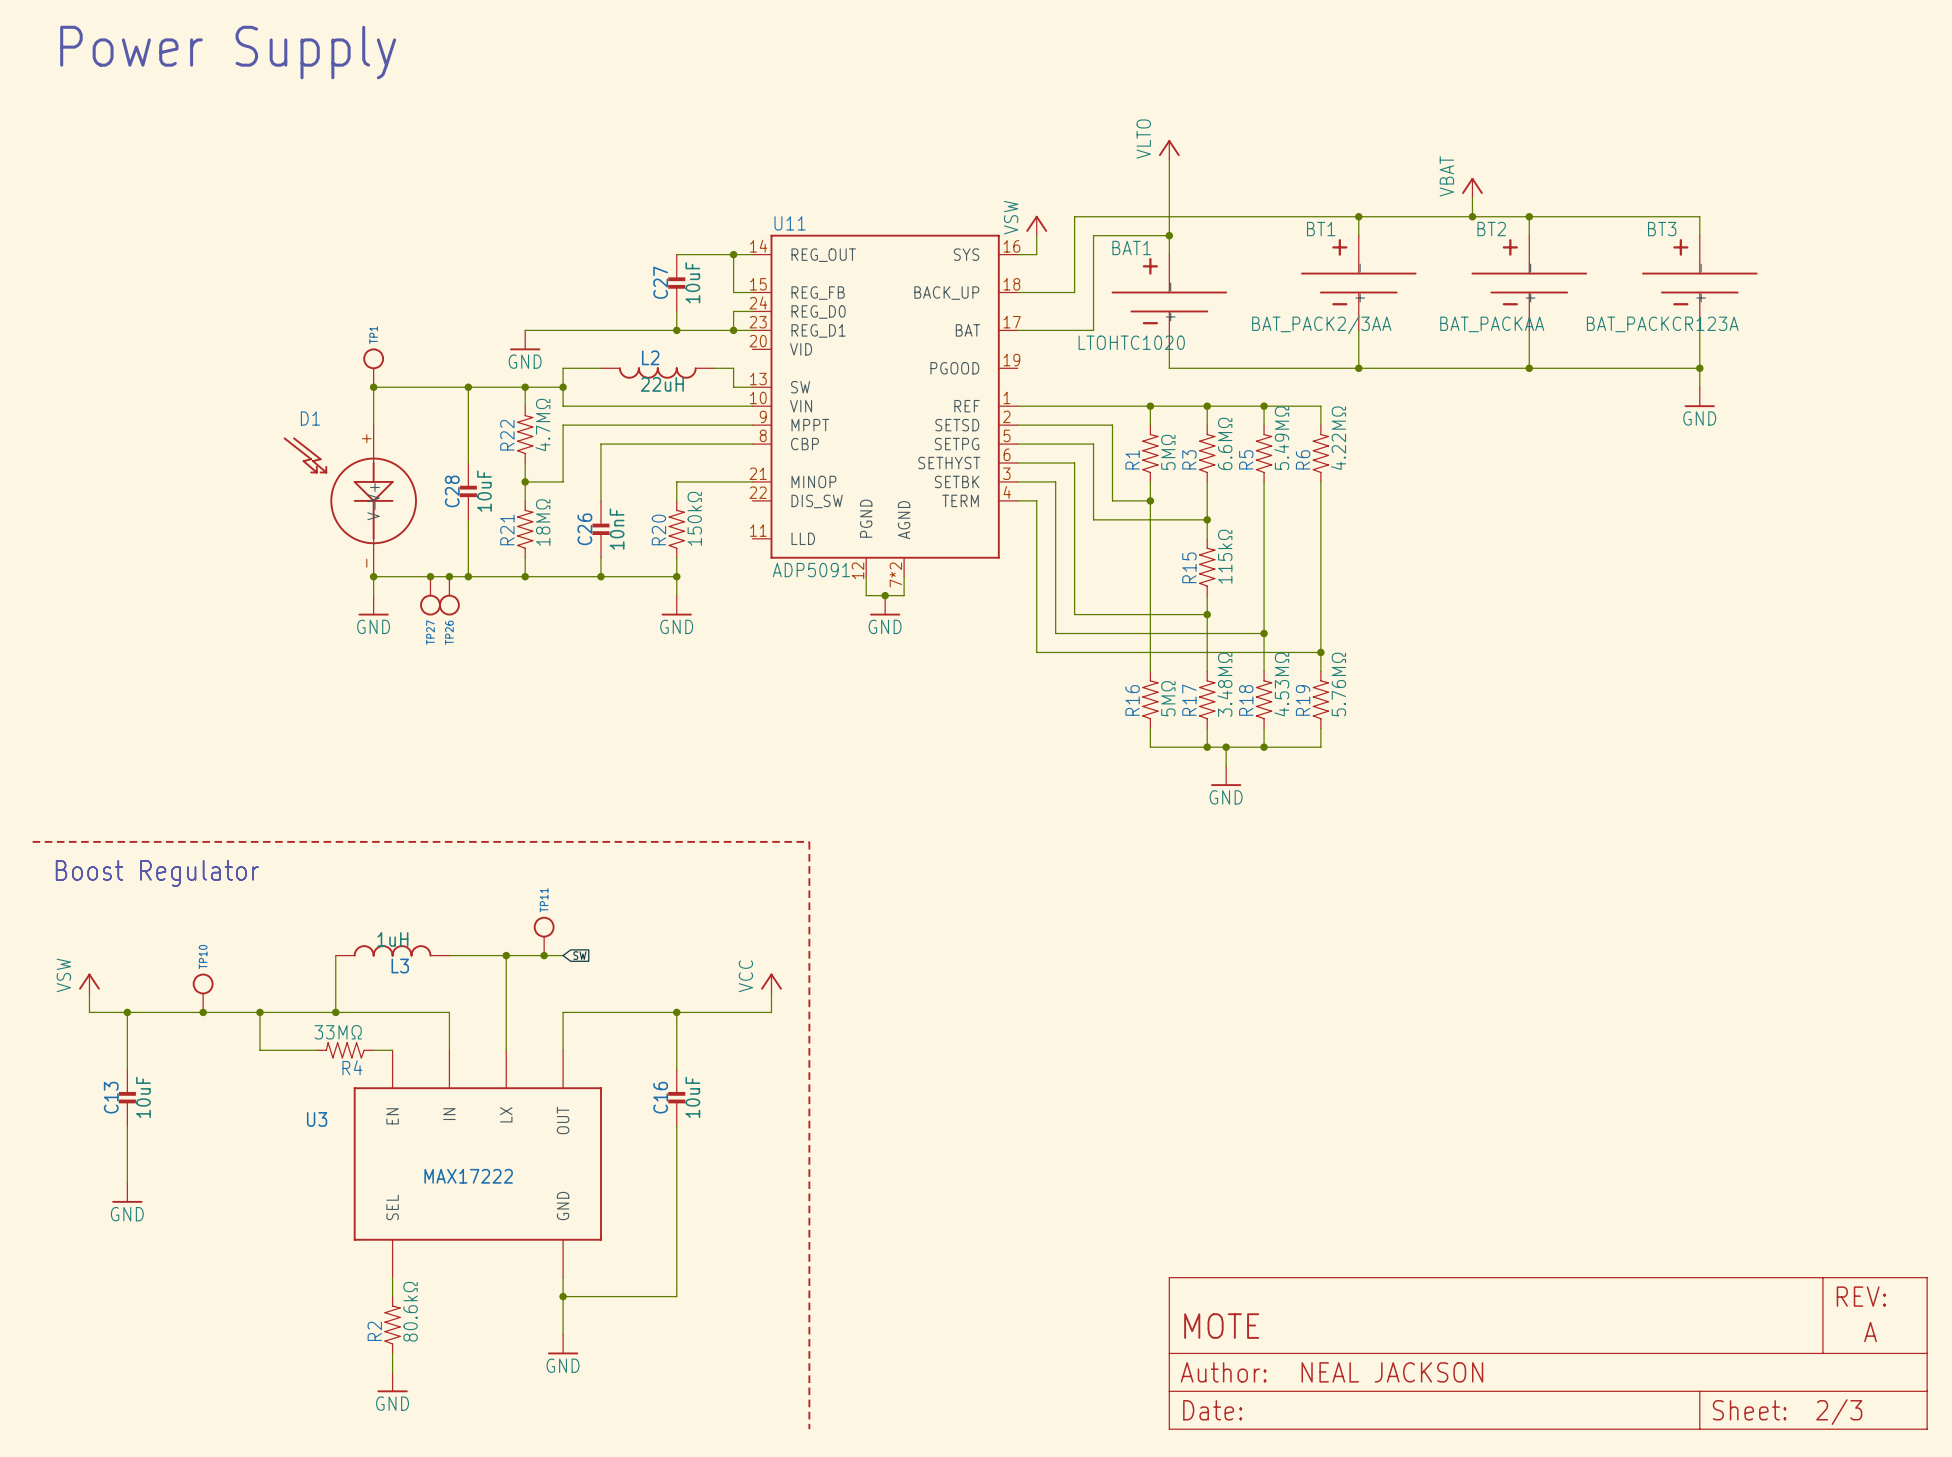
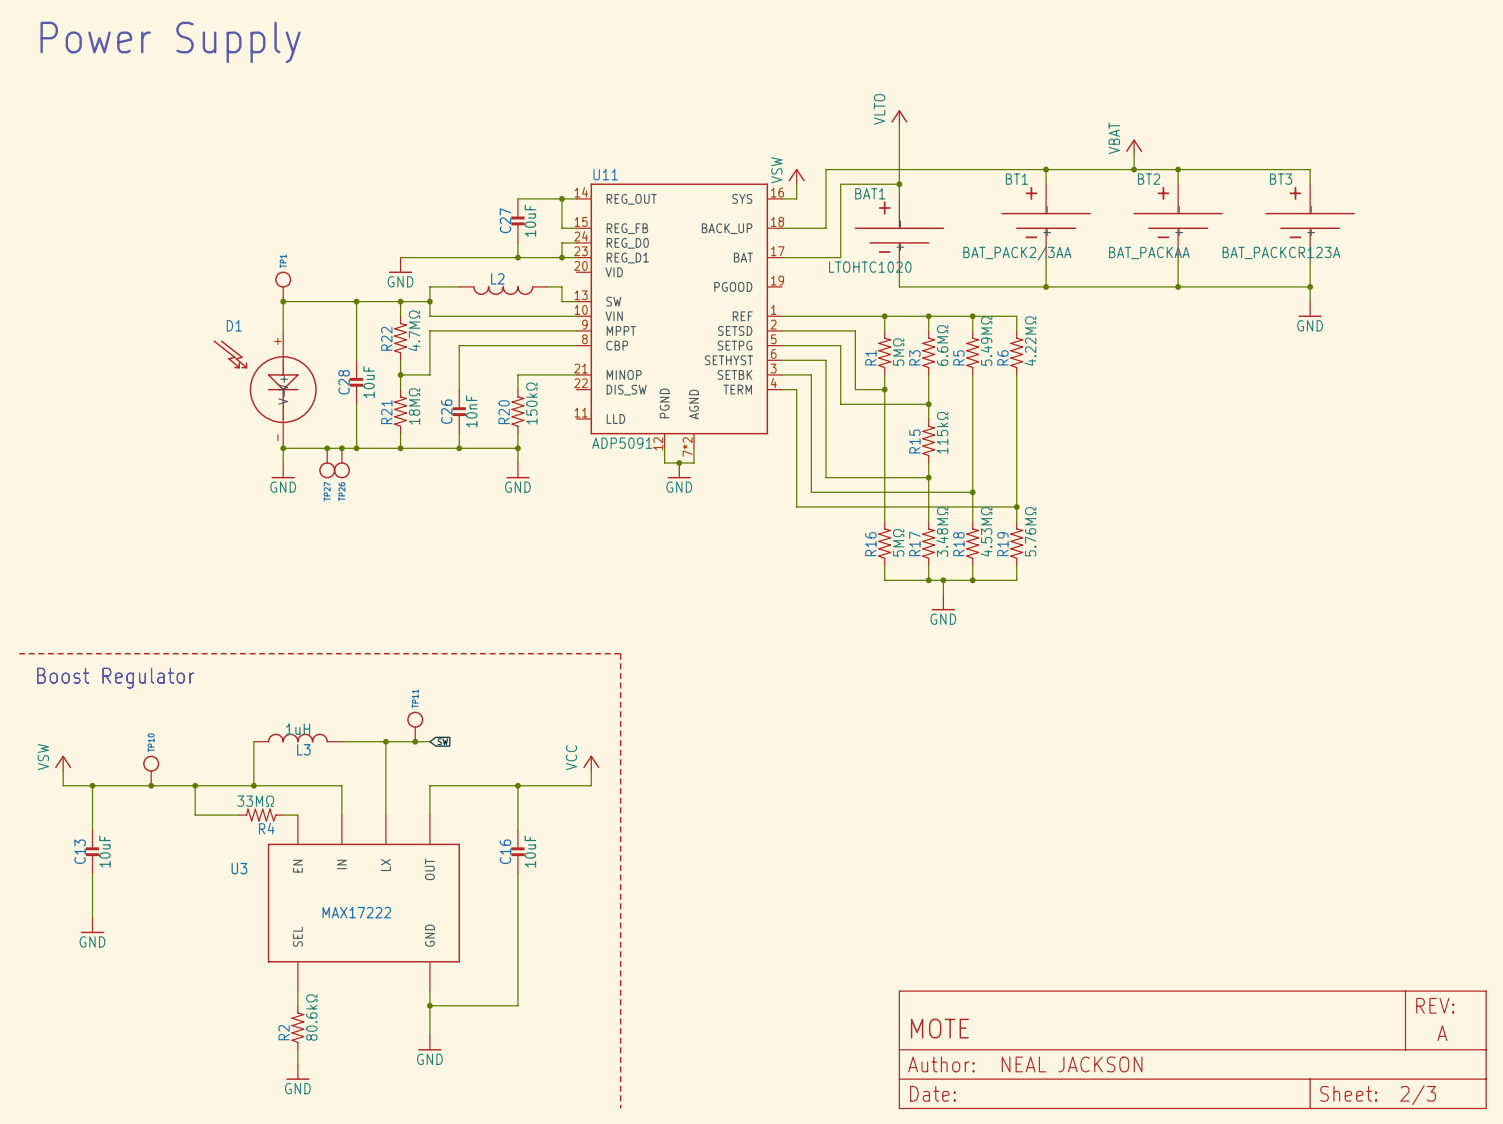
L2 value: 22uH (662, 384) -> none

